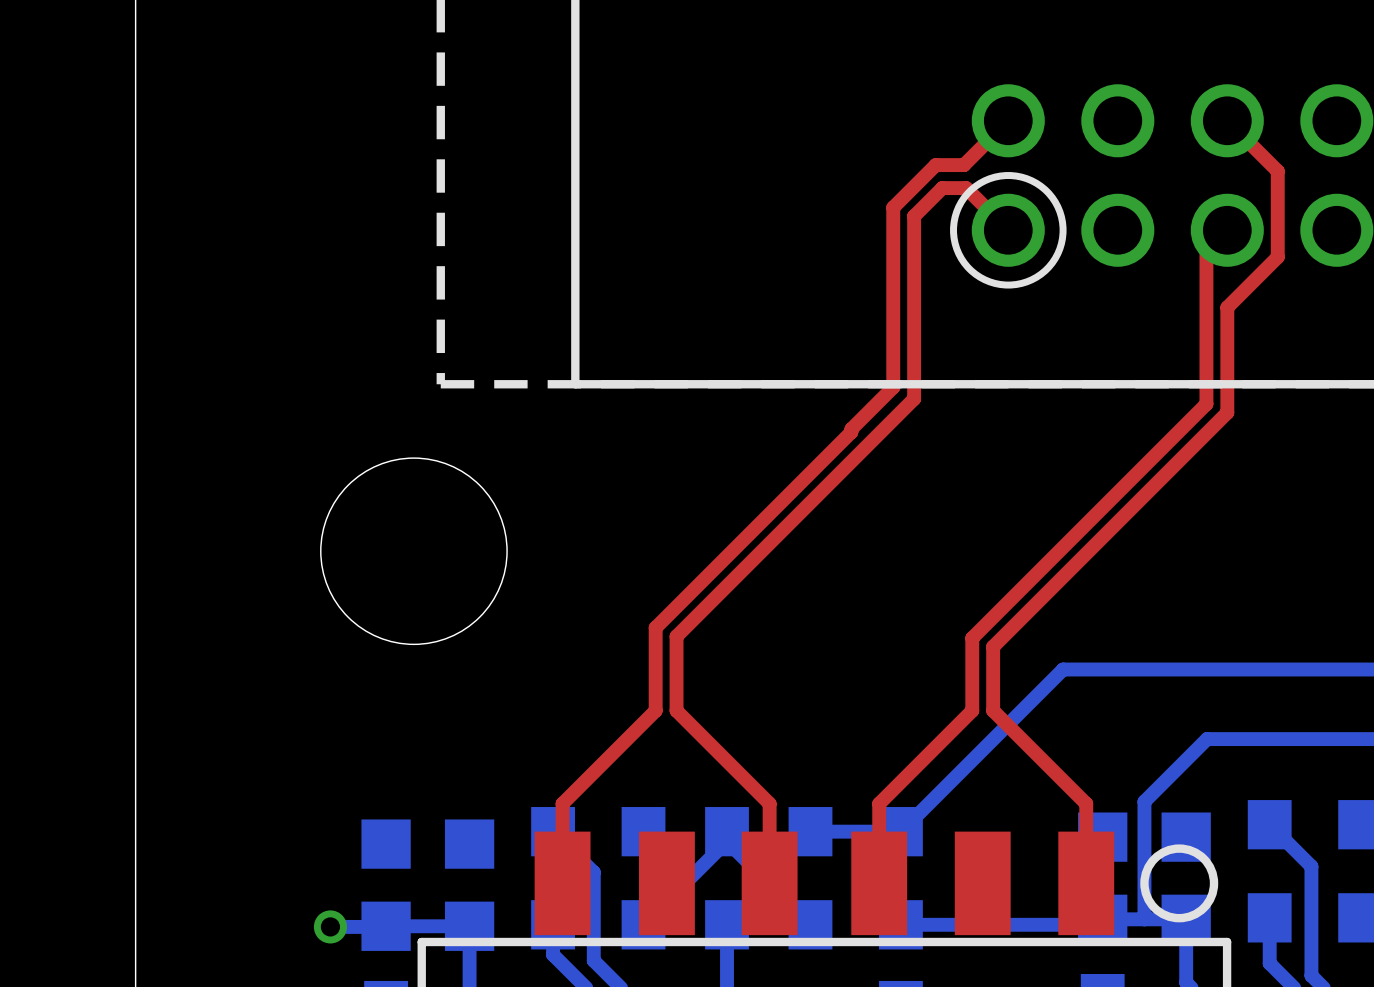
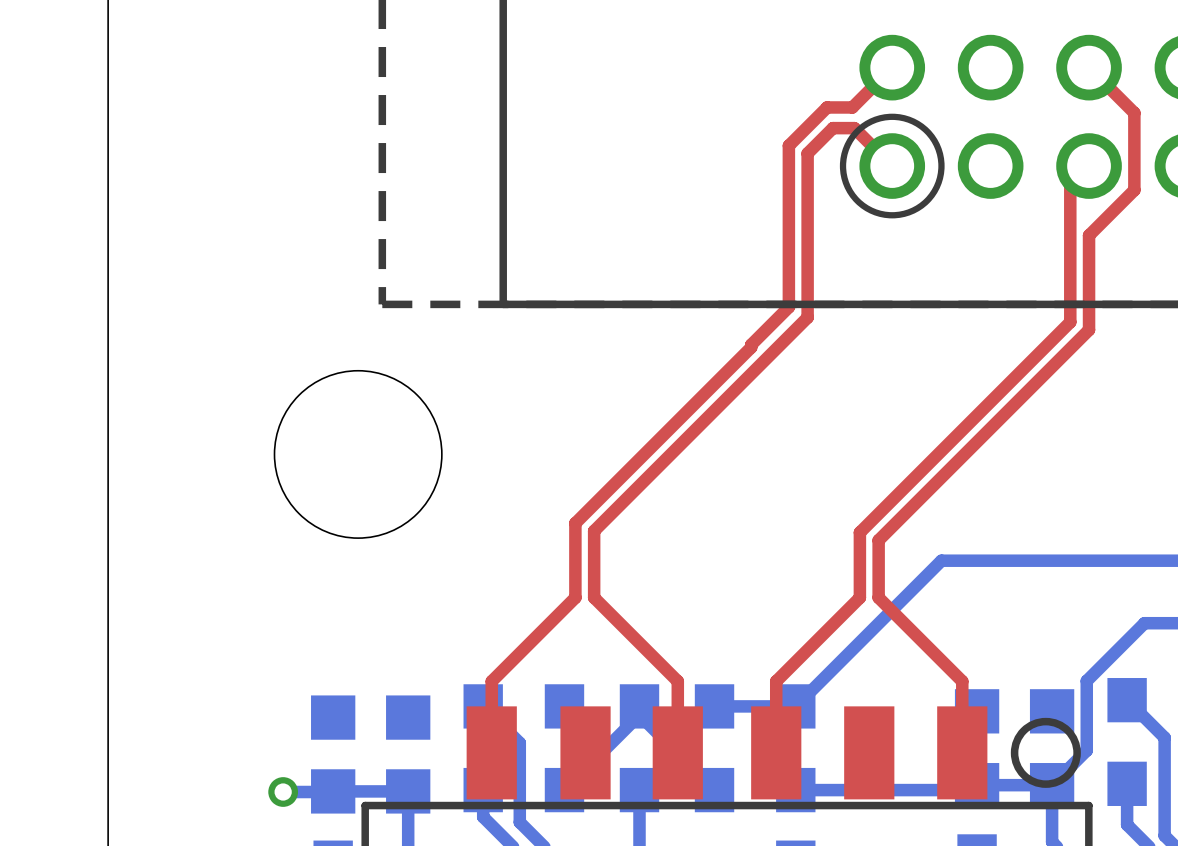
bottom track: (1289, 739) (1207, 739) (1144, 801) (1144, 919) -> (1144, 623) (1086, 680) (1086, 750) (1052, 785)

